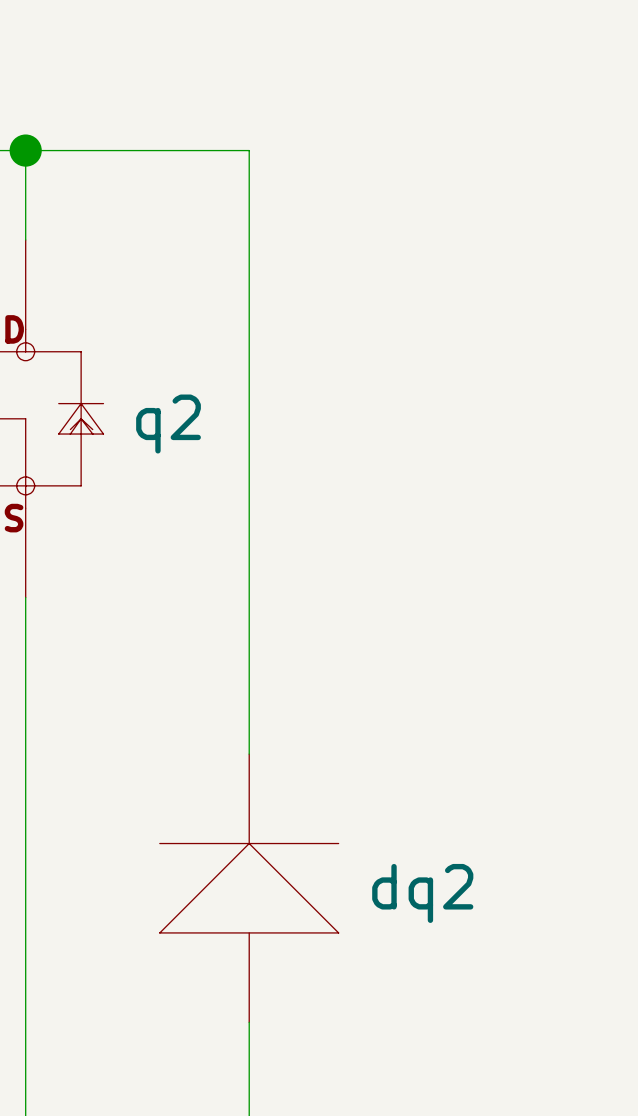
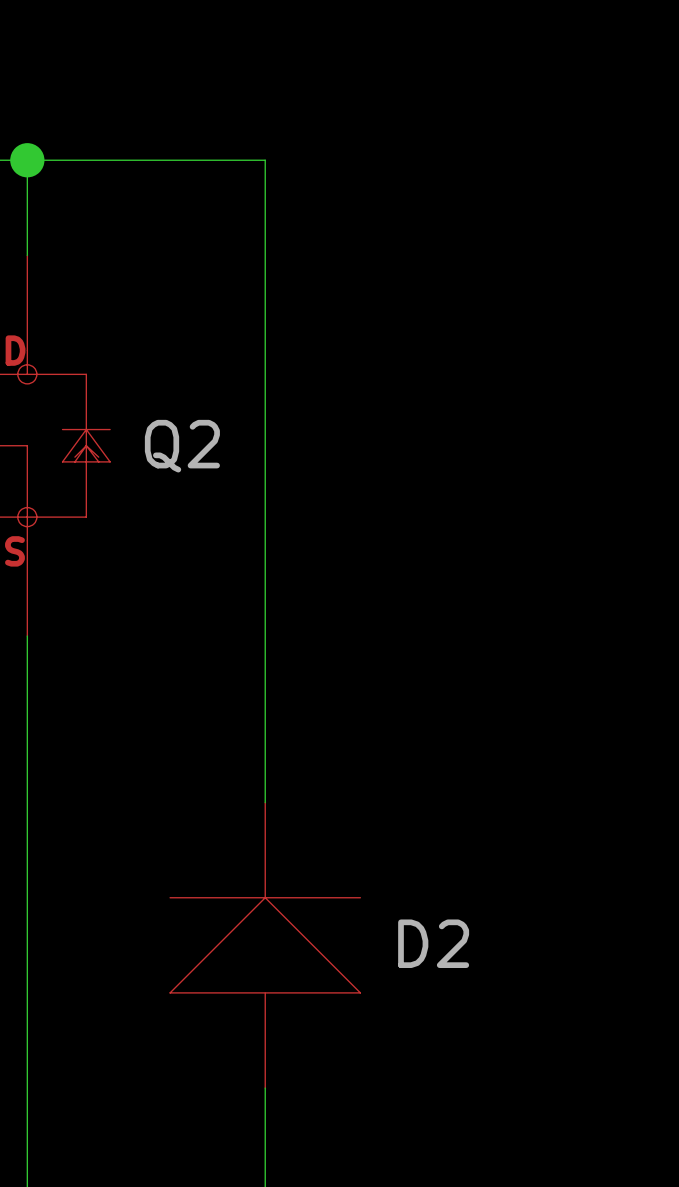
q2 name: q2 (168, 424) -> Q2 (182, 446)
dq2 name: dq2 (422, 893) -> D2 (433, 943)

